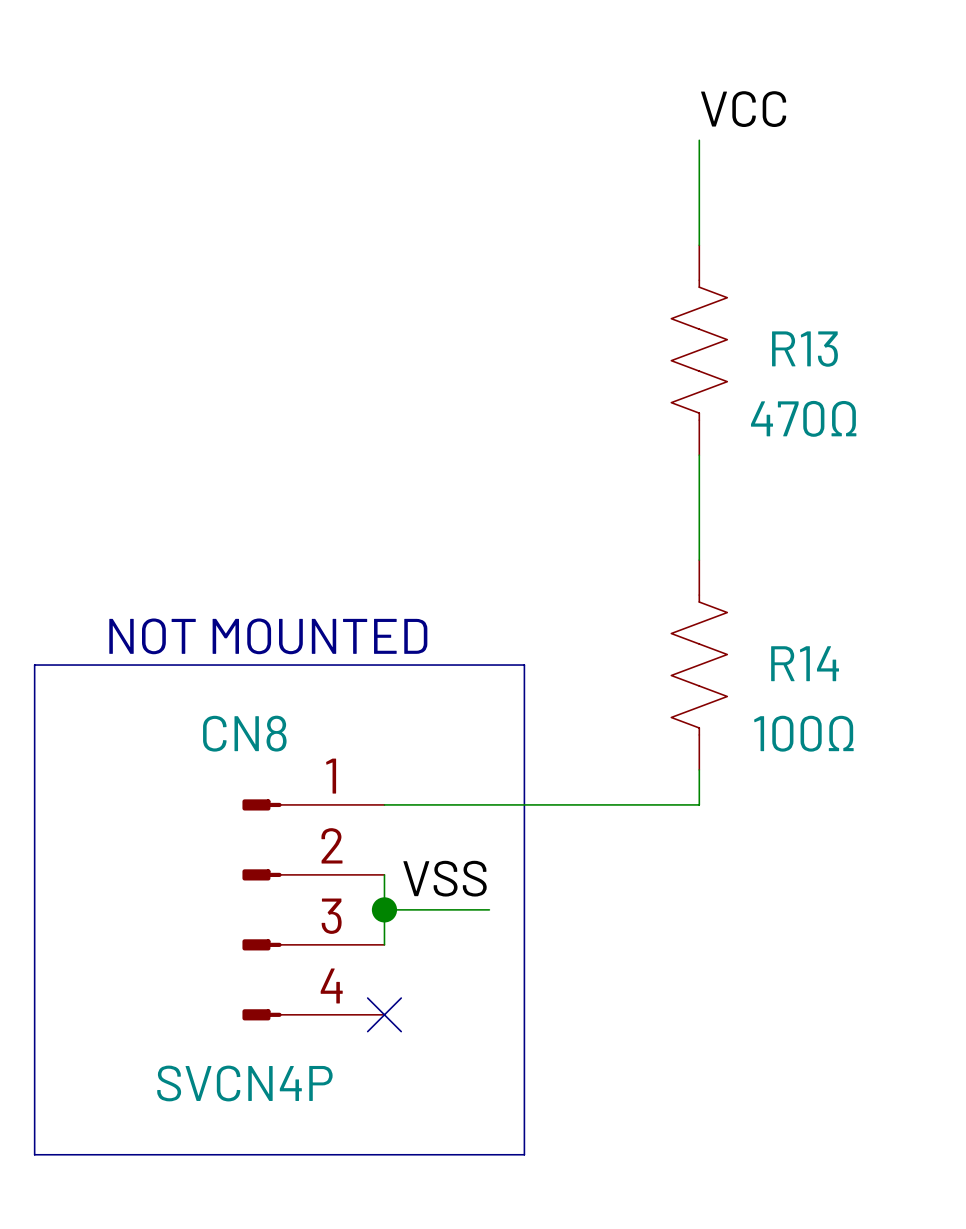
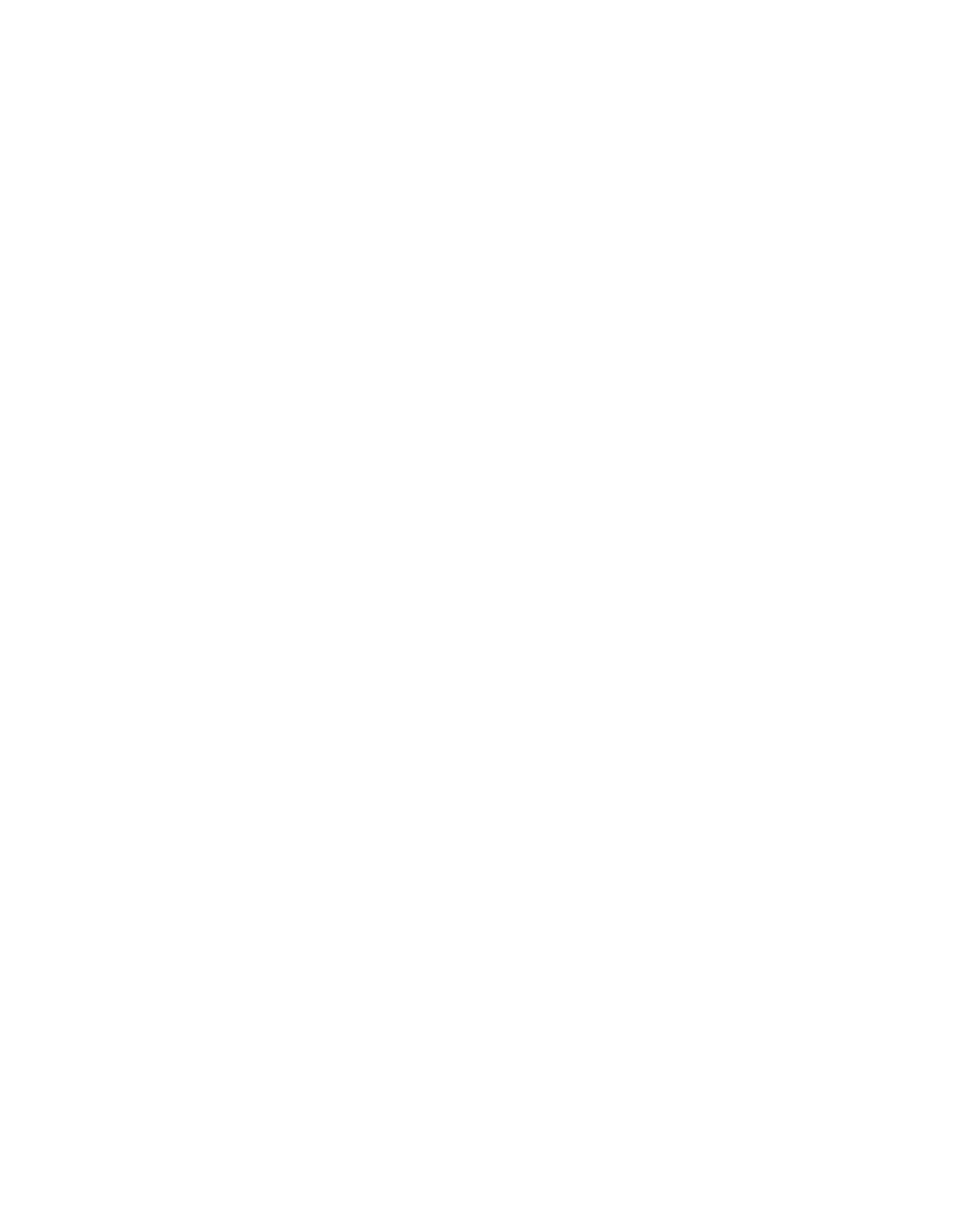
label: VCC (743, 109) -> none
wire: (699, 140) (699, 245) -> none
R13: 470Ω (699, 350) -> none
wire: (699, 455) (699, 560) -> none
text: NOT MOUNTED (268, 636) -> none
line: (34, 665) (524, 665) (524, 1154) (34, 1154) (34, 665) -> none
R14: 100Ω (699, 665) -> none
wire: (699, 769) (699, 804) (384, 804) -> none
wire: (384, 874) (384, 944) -> none
label: VSS (445, 878) -> none
CN8: SVCN4P (313, 909) -> none
wire: (384, 909) (489, 909) -> none
junction: (384, 909) -> none
no-connect mark: (384, 1014) -> none

